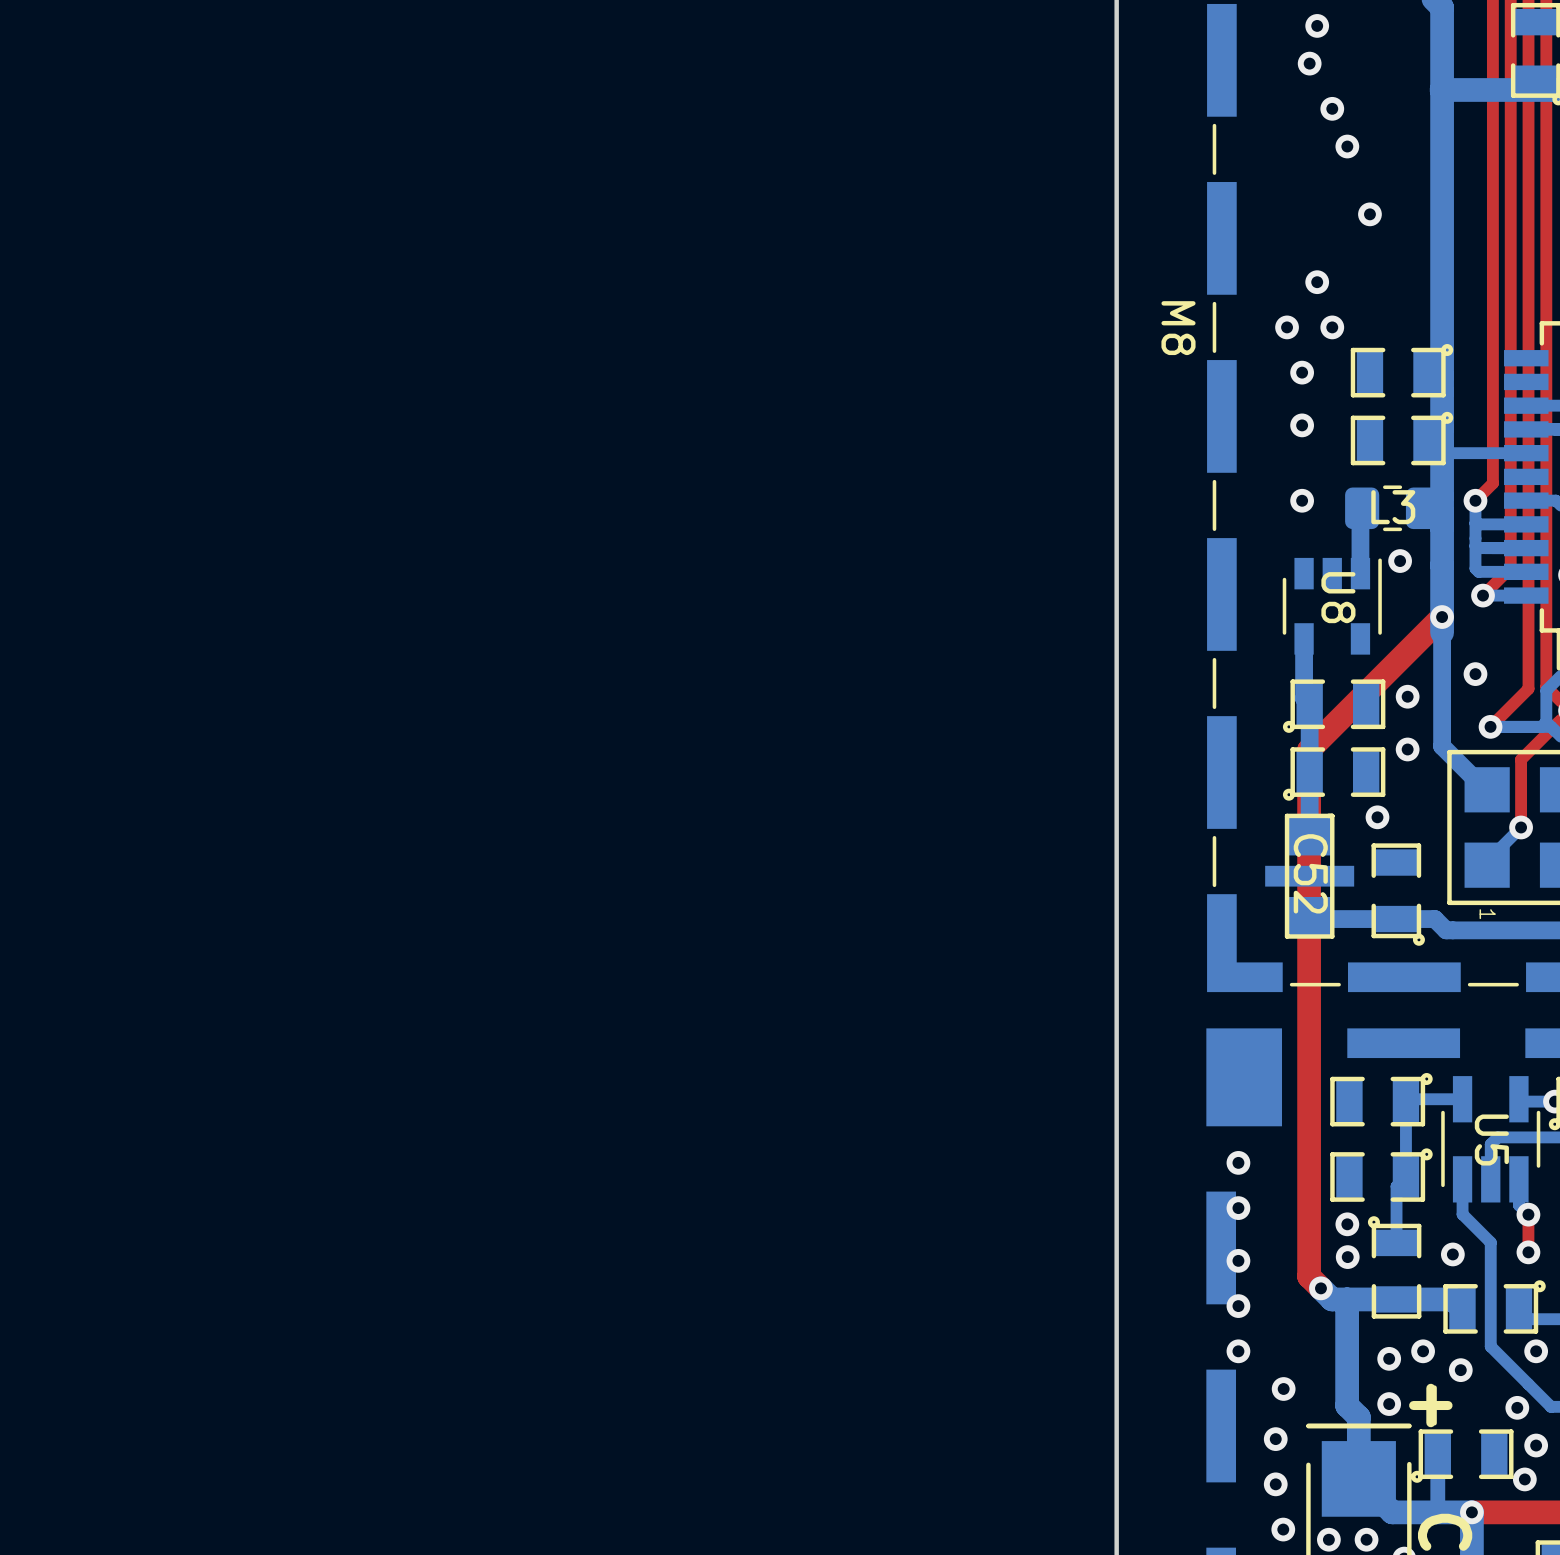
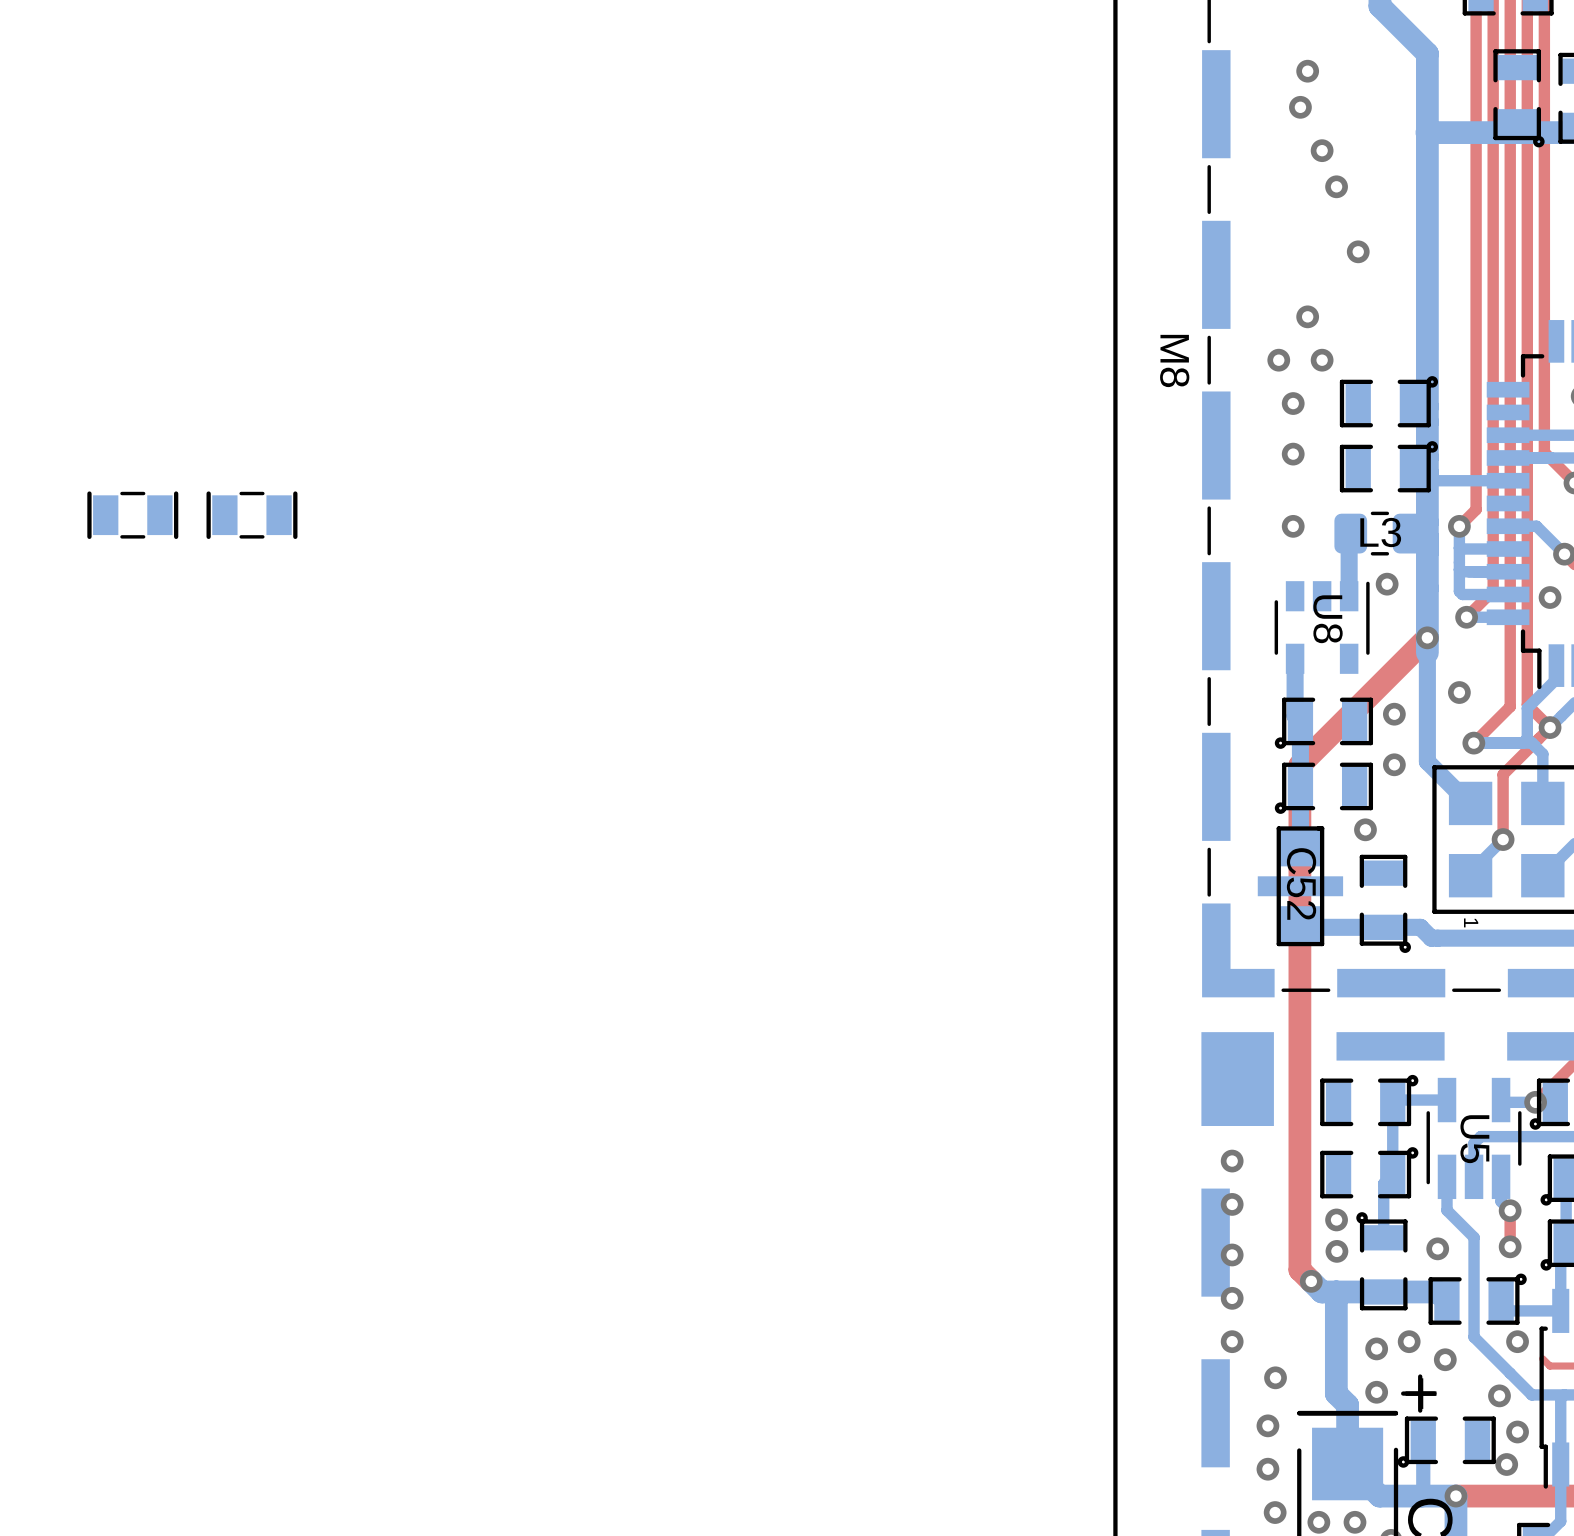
part: none -> (132, 515)
part: none -> (251, 515)

